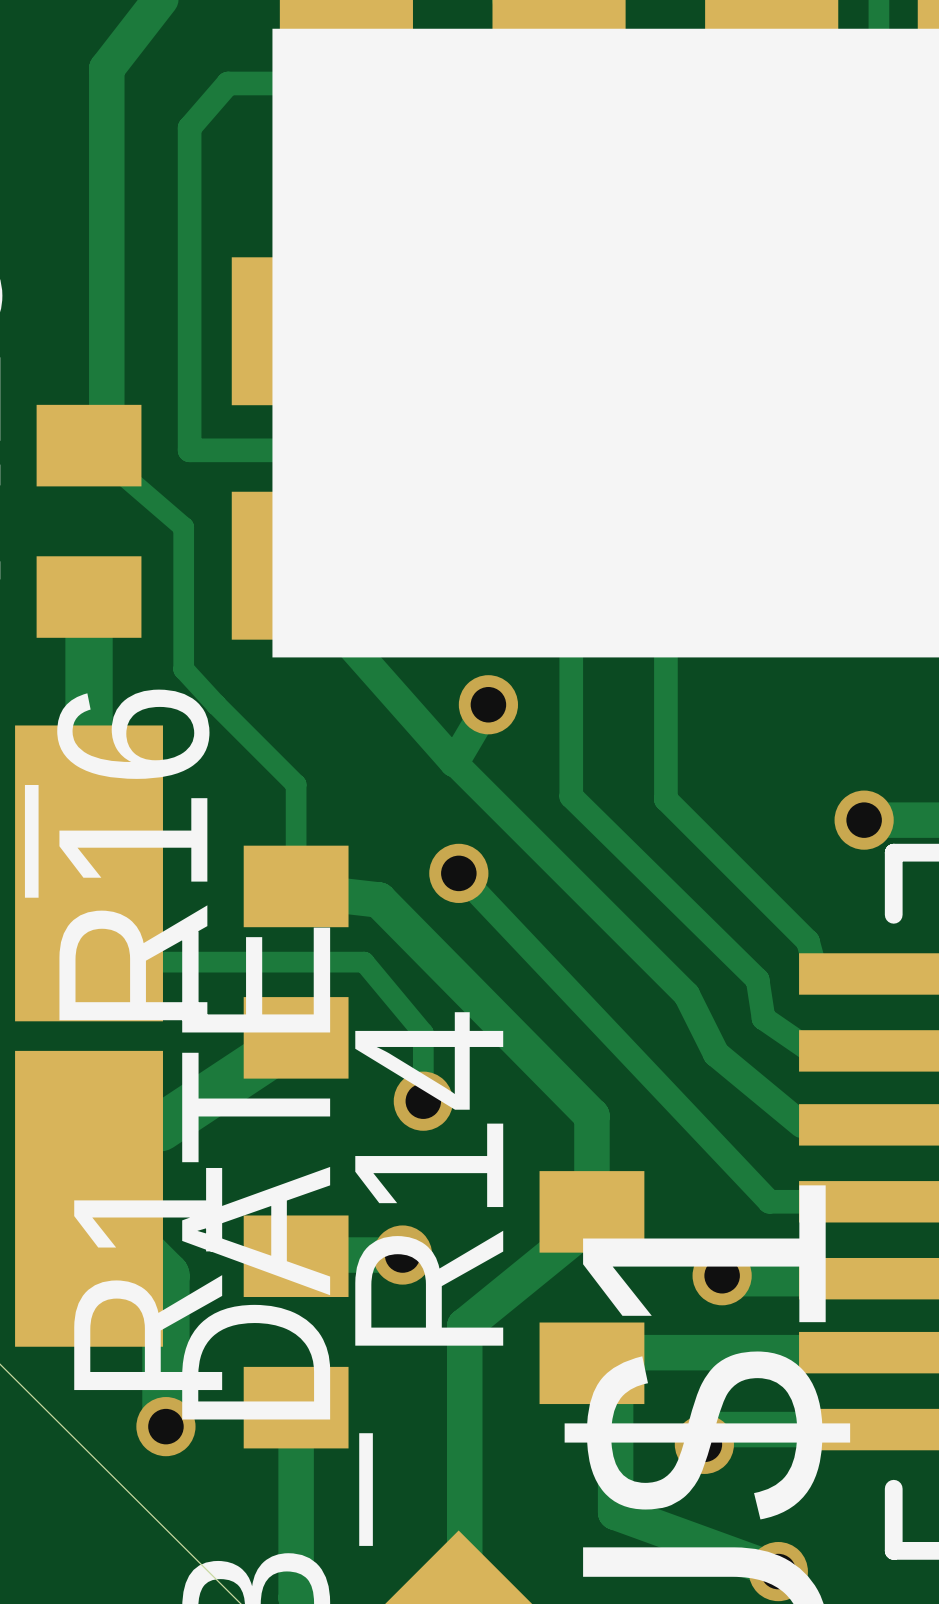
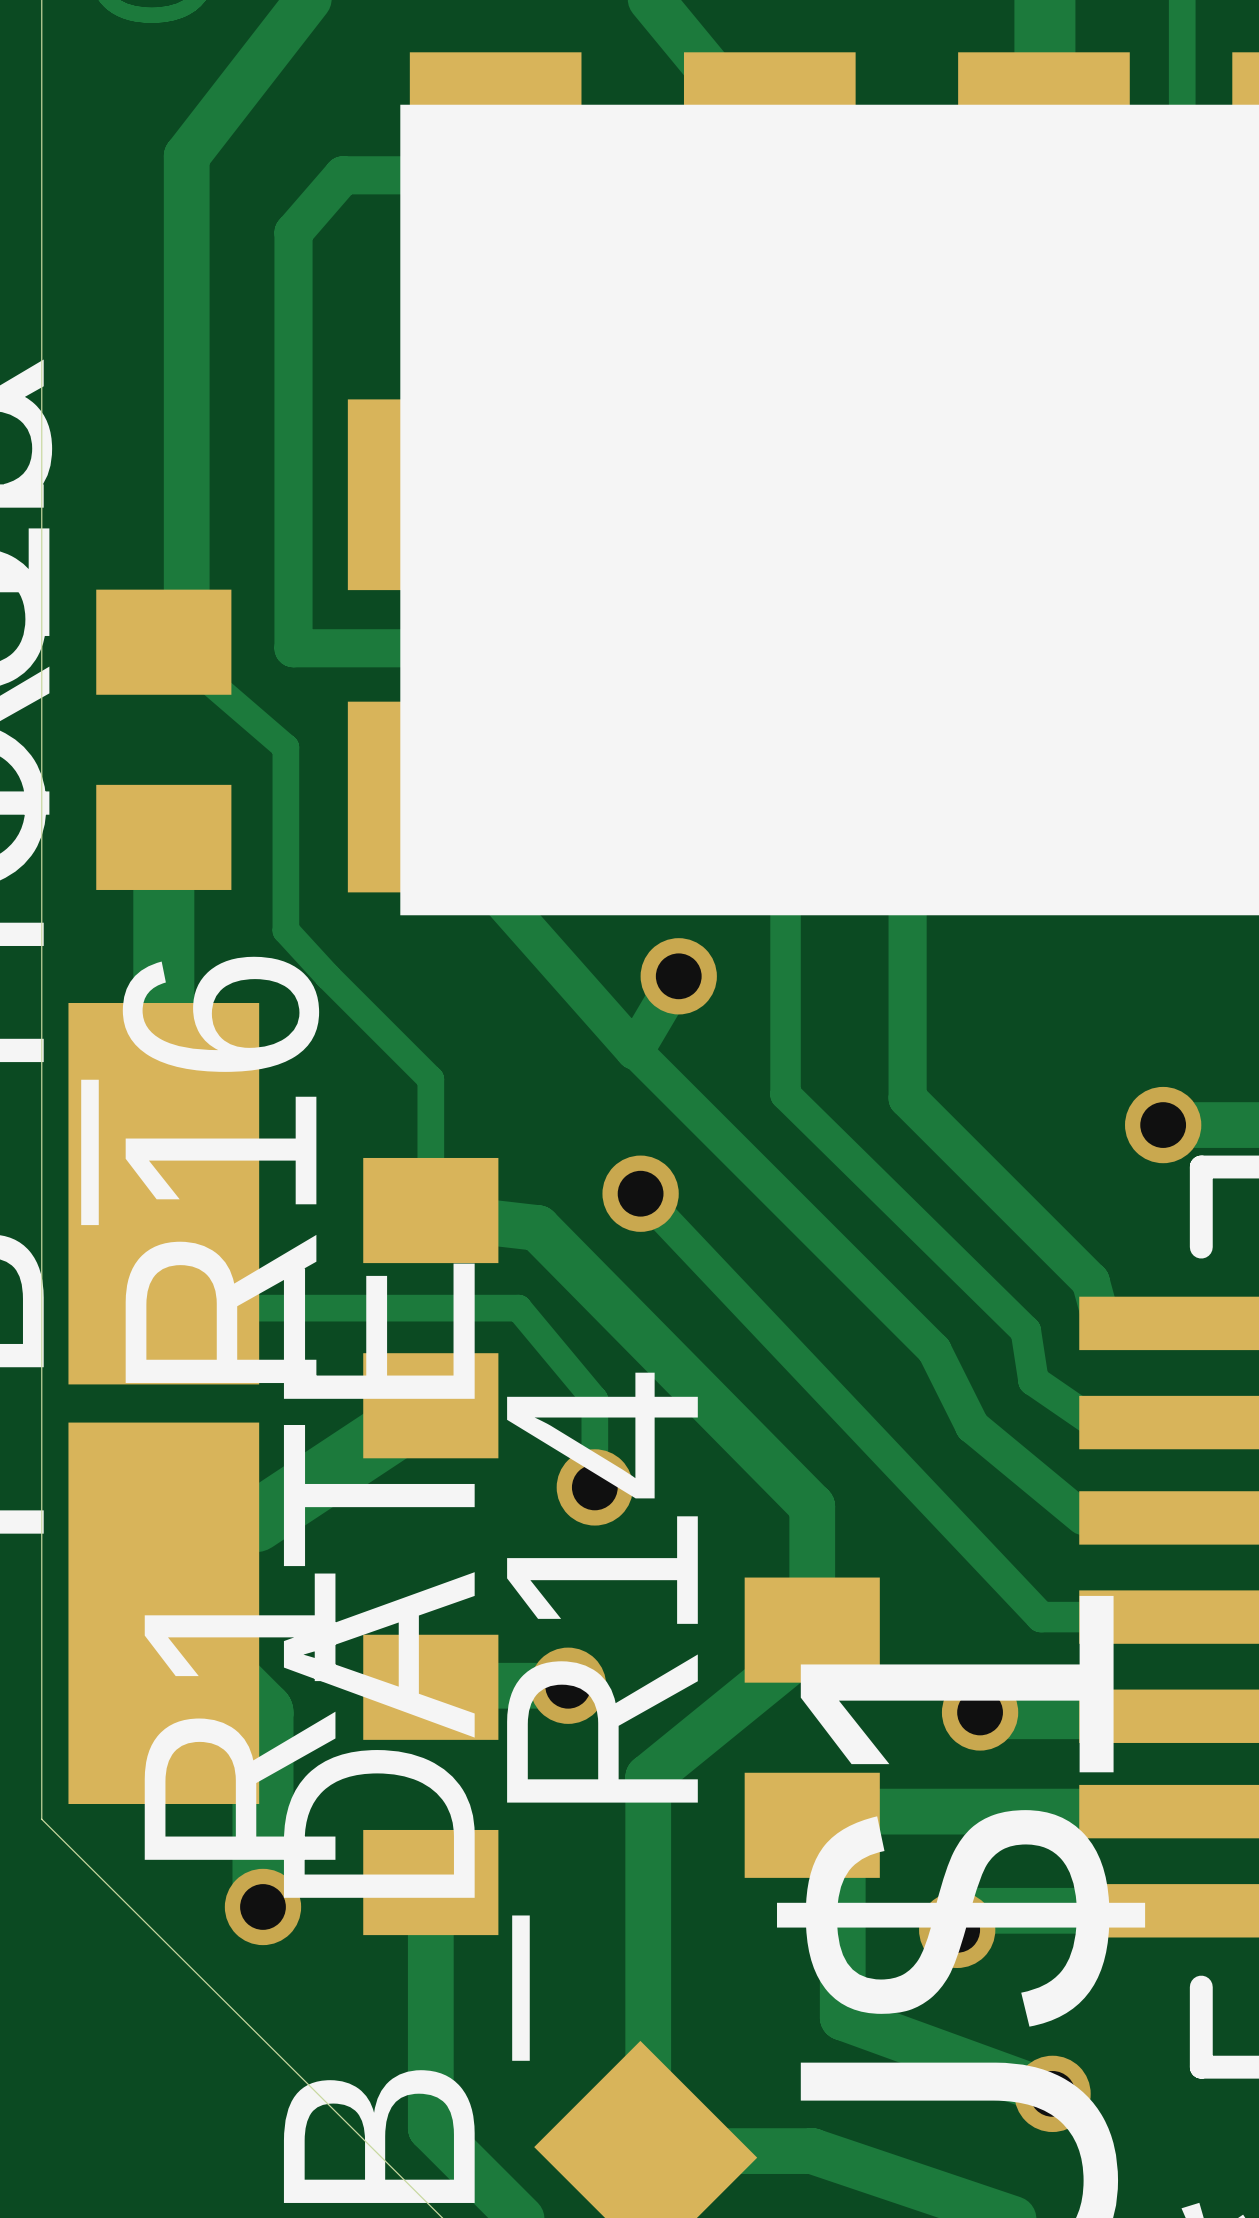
track width: thin (345, 83) (228, 83) (189, 127) (189, 450) (589, 450) (665, 506) (665, 799) (807, 941) (816, 973) (887, 973) -> thick (494, 175) (343, 175) (293, 232) (293, 648) (808, 648) (907, 720) (907, 1098) (1090, 1281) (1102, 1323) (1193, 1323)

